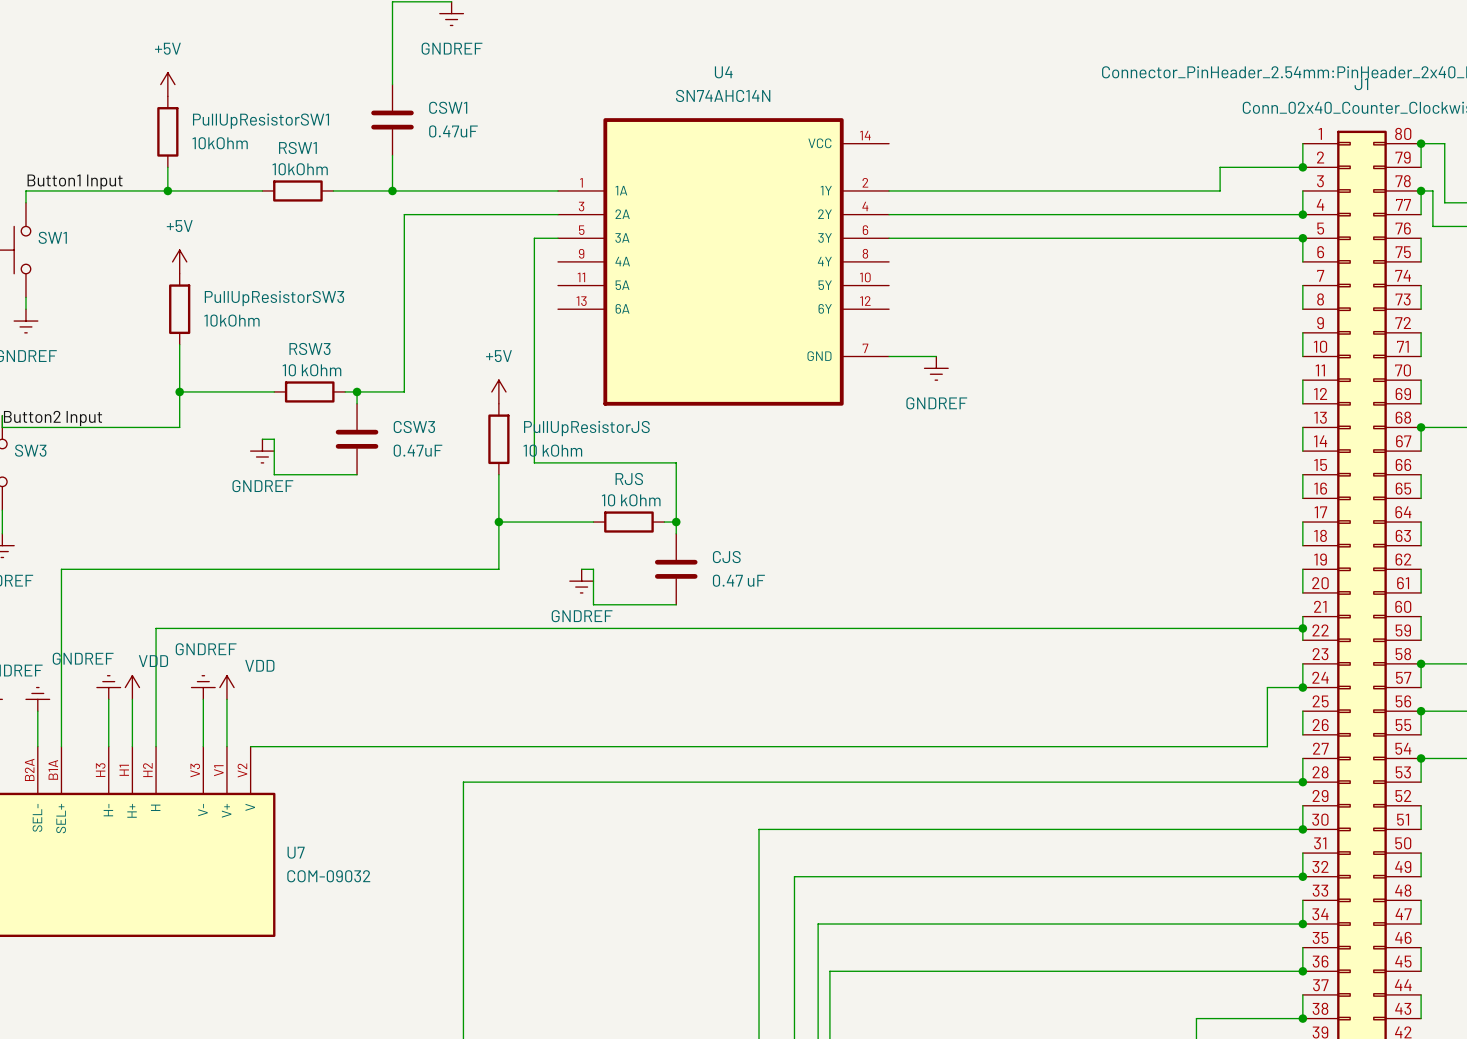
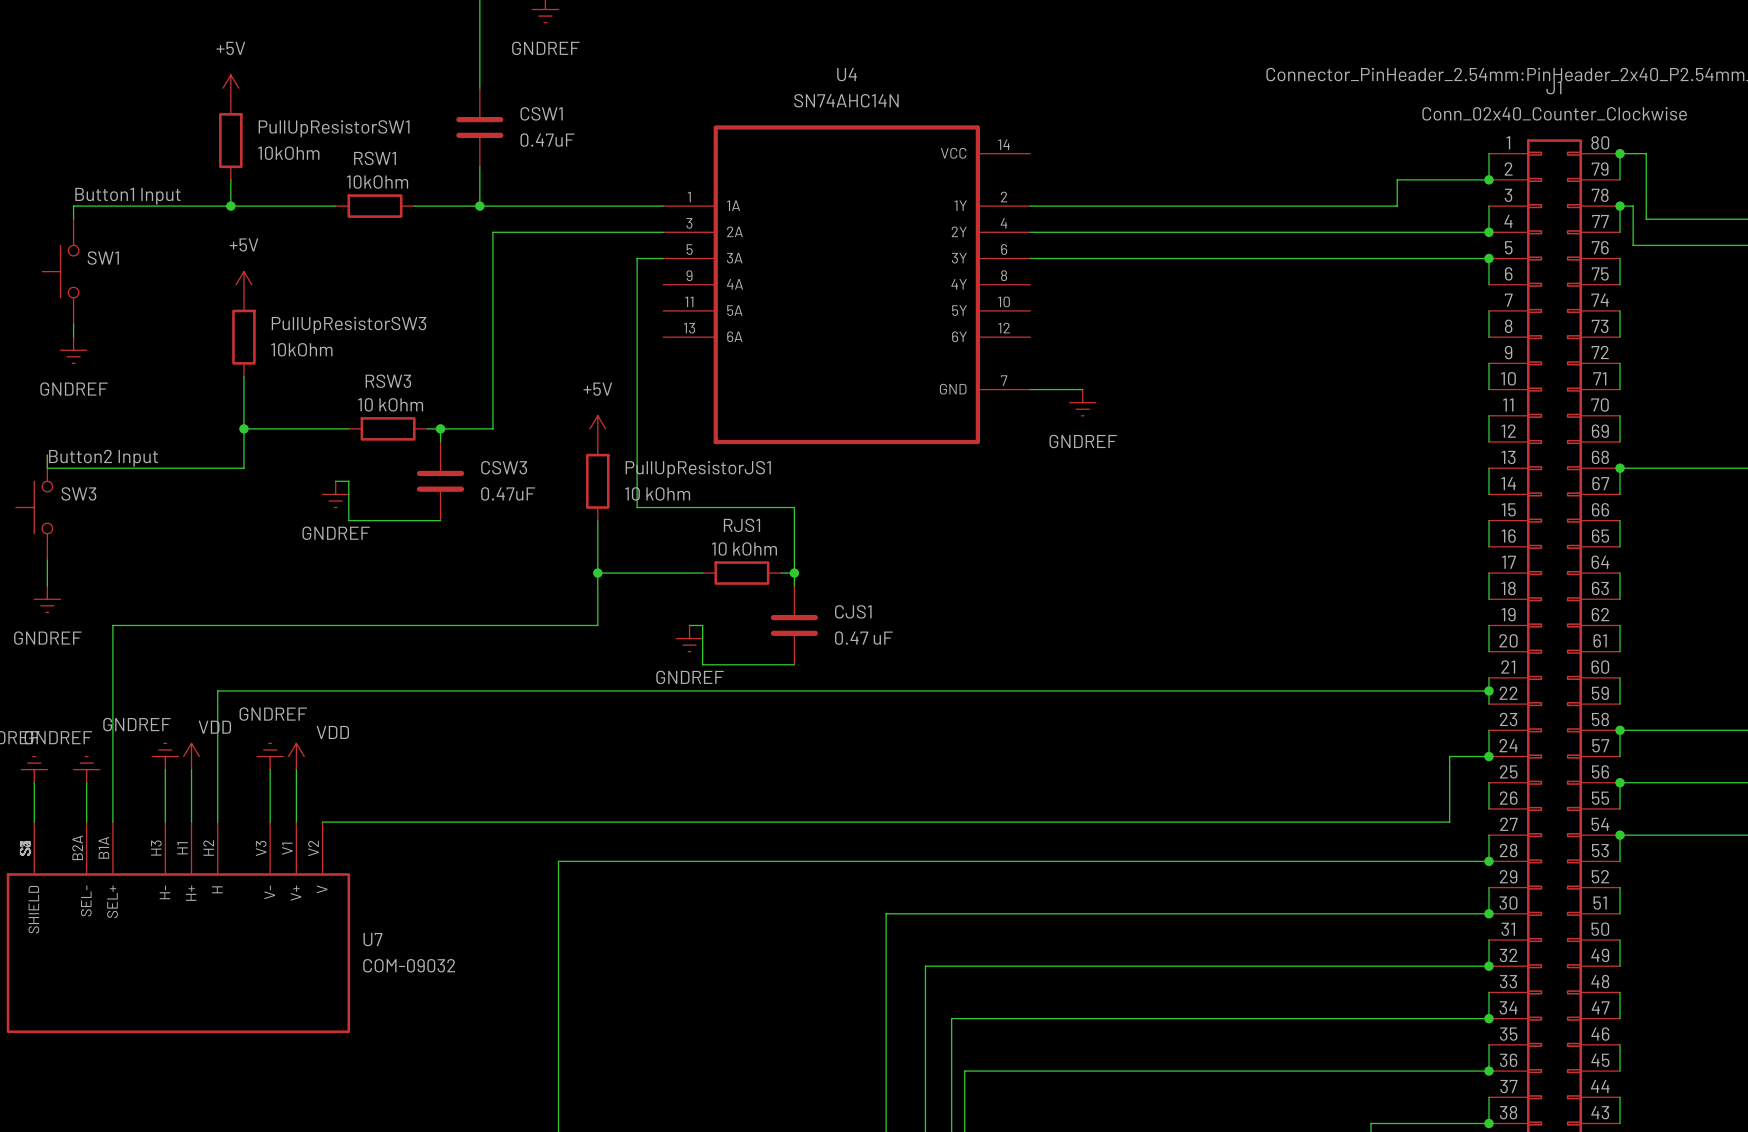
PullUpResistorJS name: PullUpResistorJS (586, 428) -> PullUpResistorJS1 (698, 469)
RJS name: RJS (629, 479) -> RJS1 (741, 525)
CJS name: CJS (726, 557) -> CJS1 (853, 611)

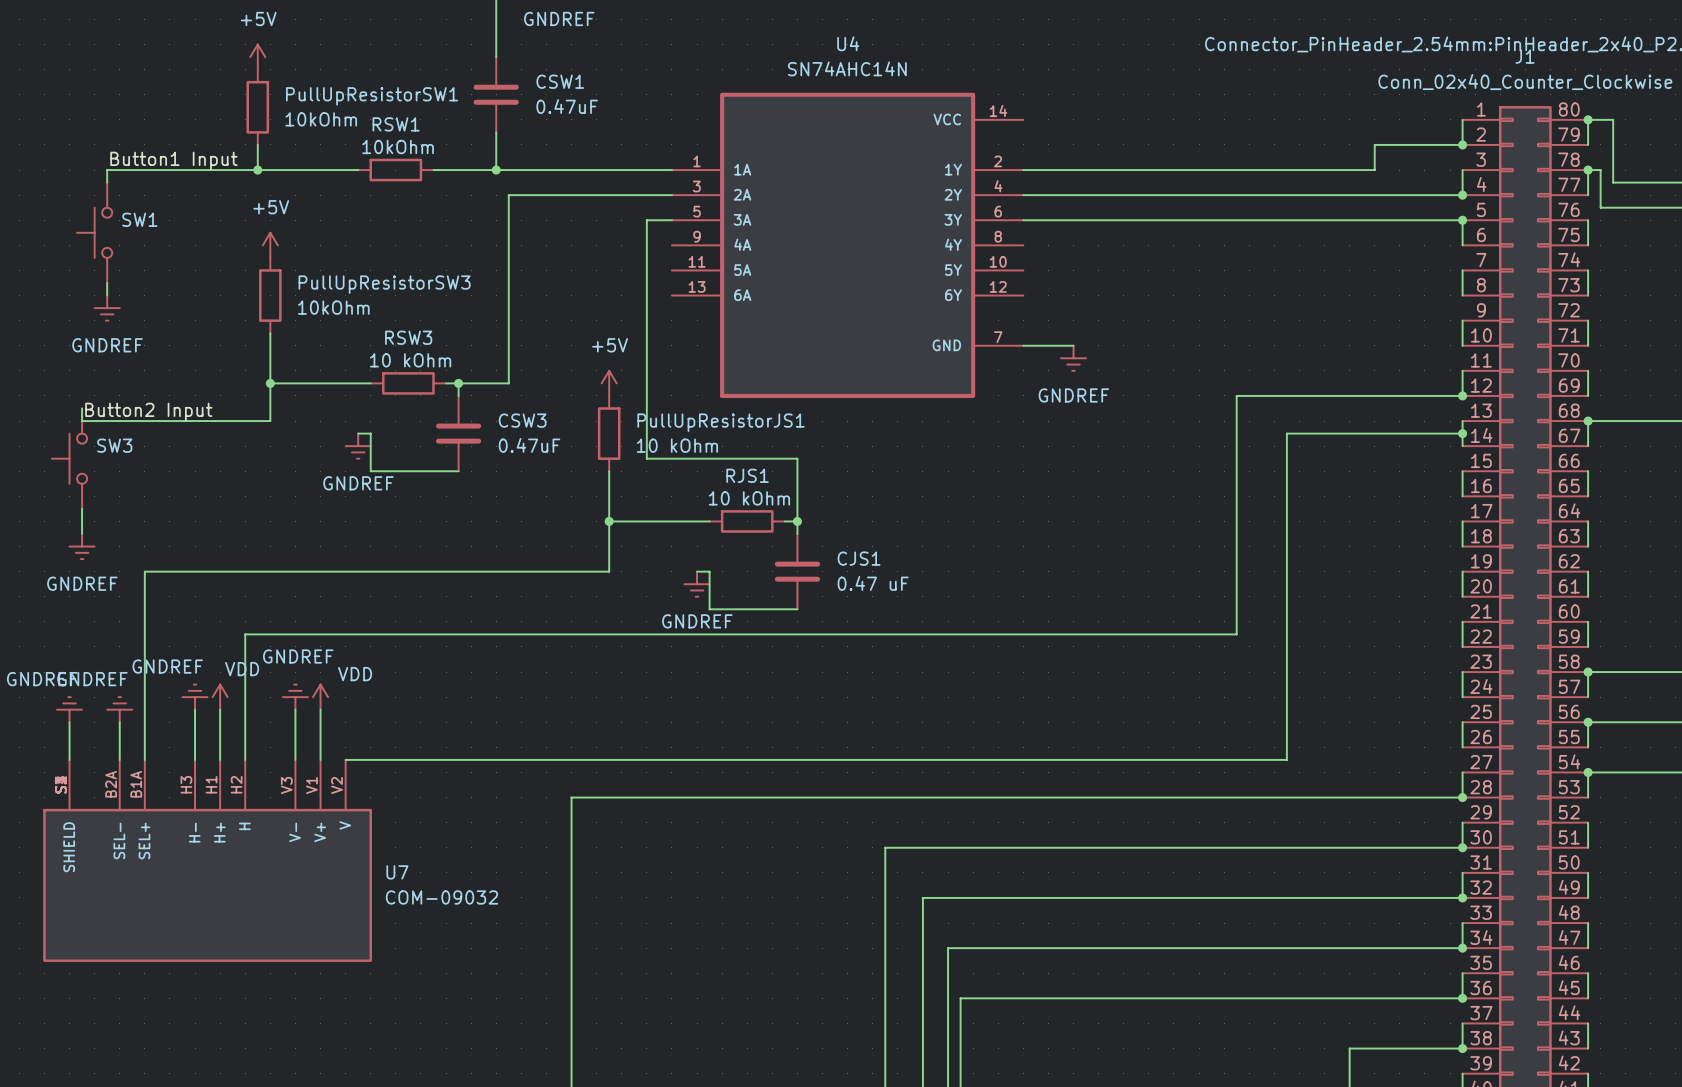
junction: none -> (1462, 395)
junction: none -> (1462, 433)
wire: (1253, 691) (1488, 691) -> (1236, 634) (1236, 395) (1462, 395)
junction: (1488, 691) -> none
wire: (1488, 756) (1449, 756) (1449, 822) (1305, 822) -> (1462, 433) (1286, 433) (1286, 759)
junction: (1488, 756) -> none

